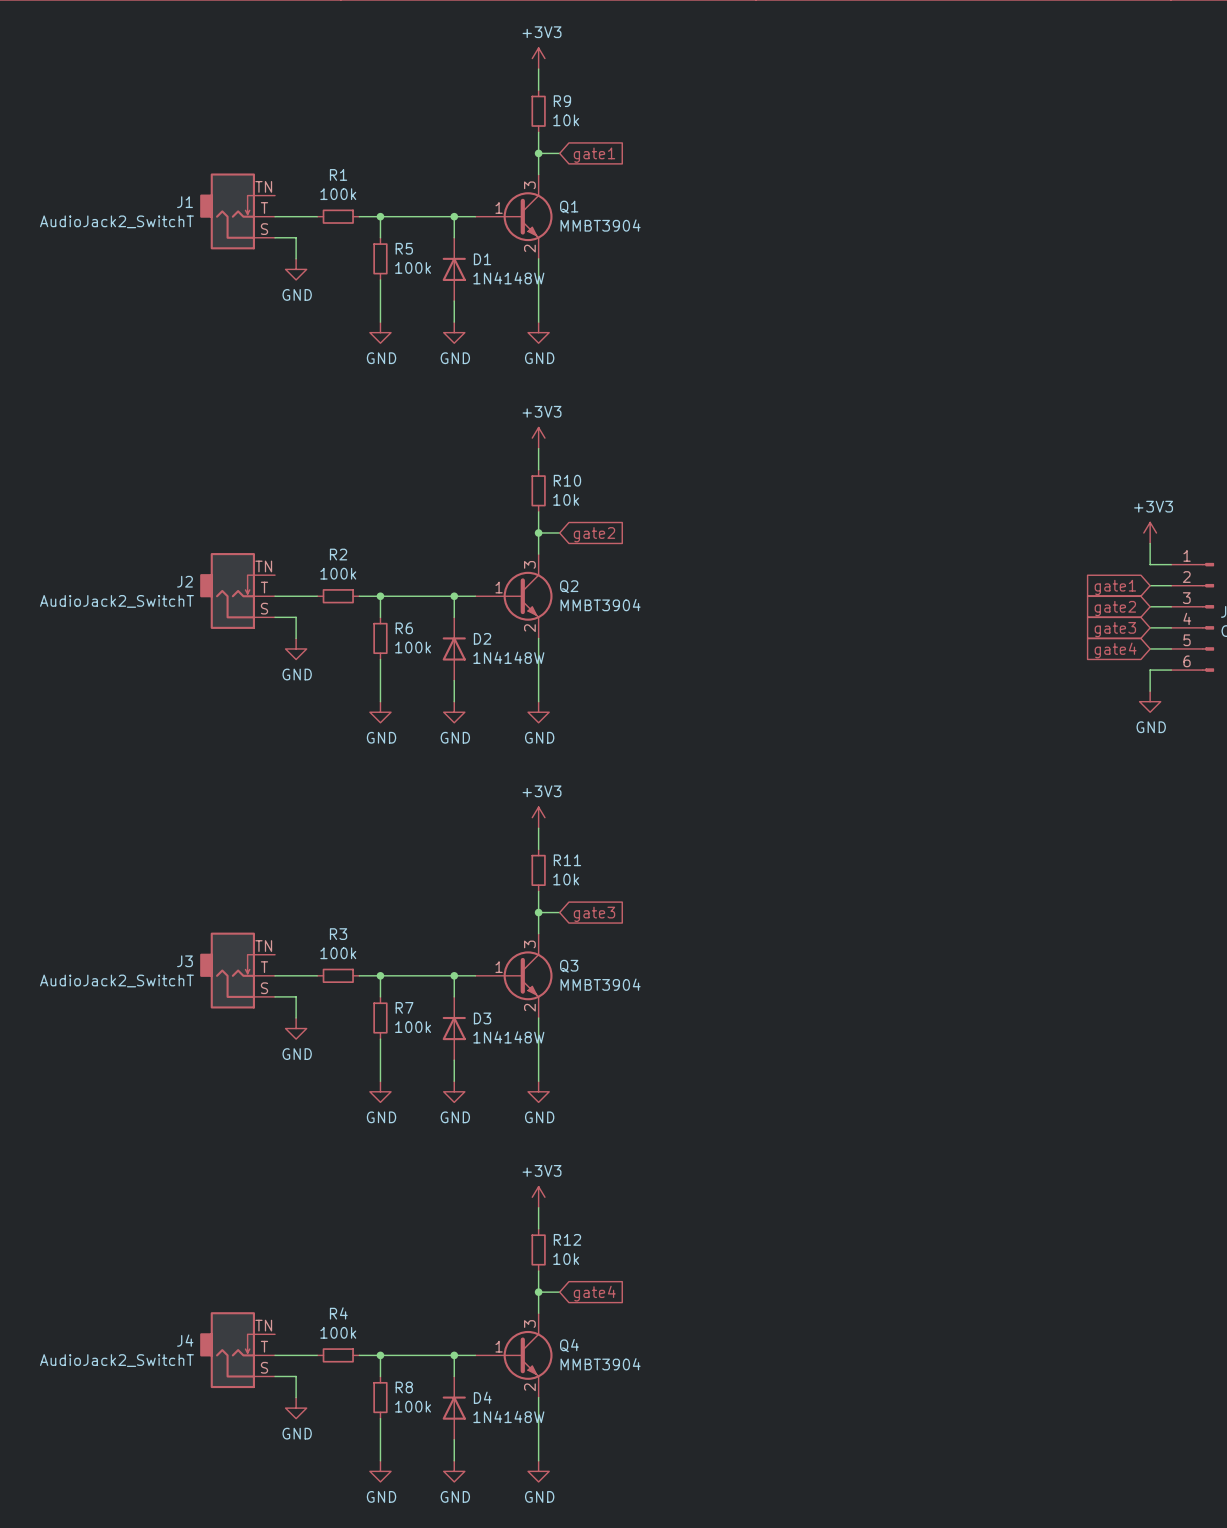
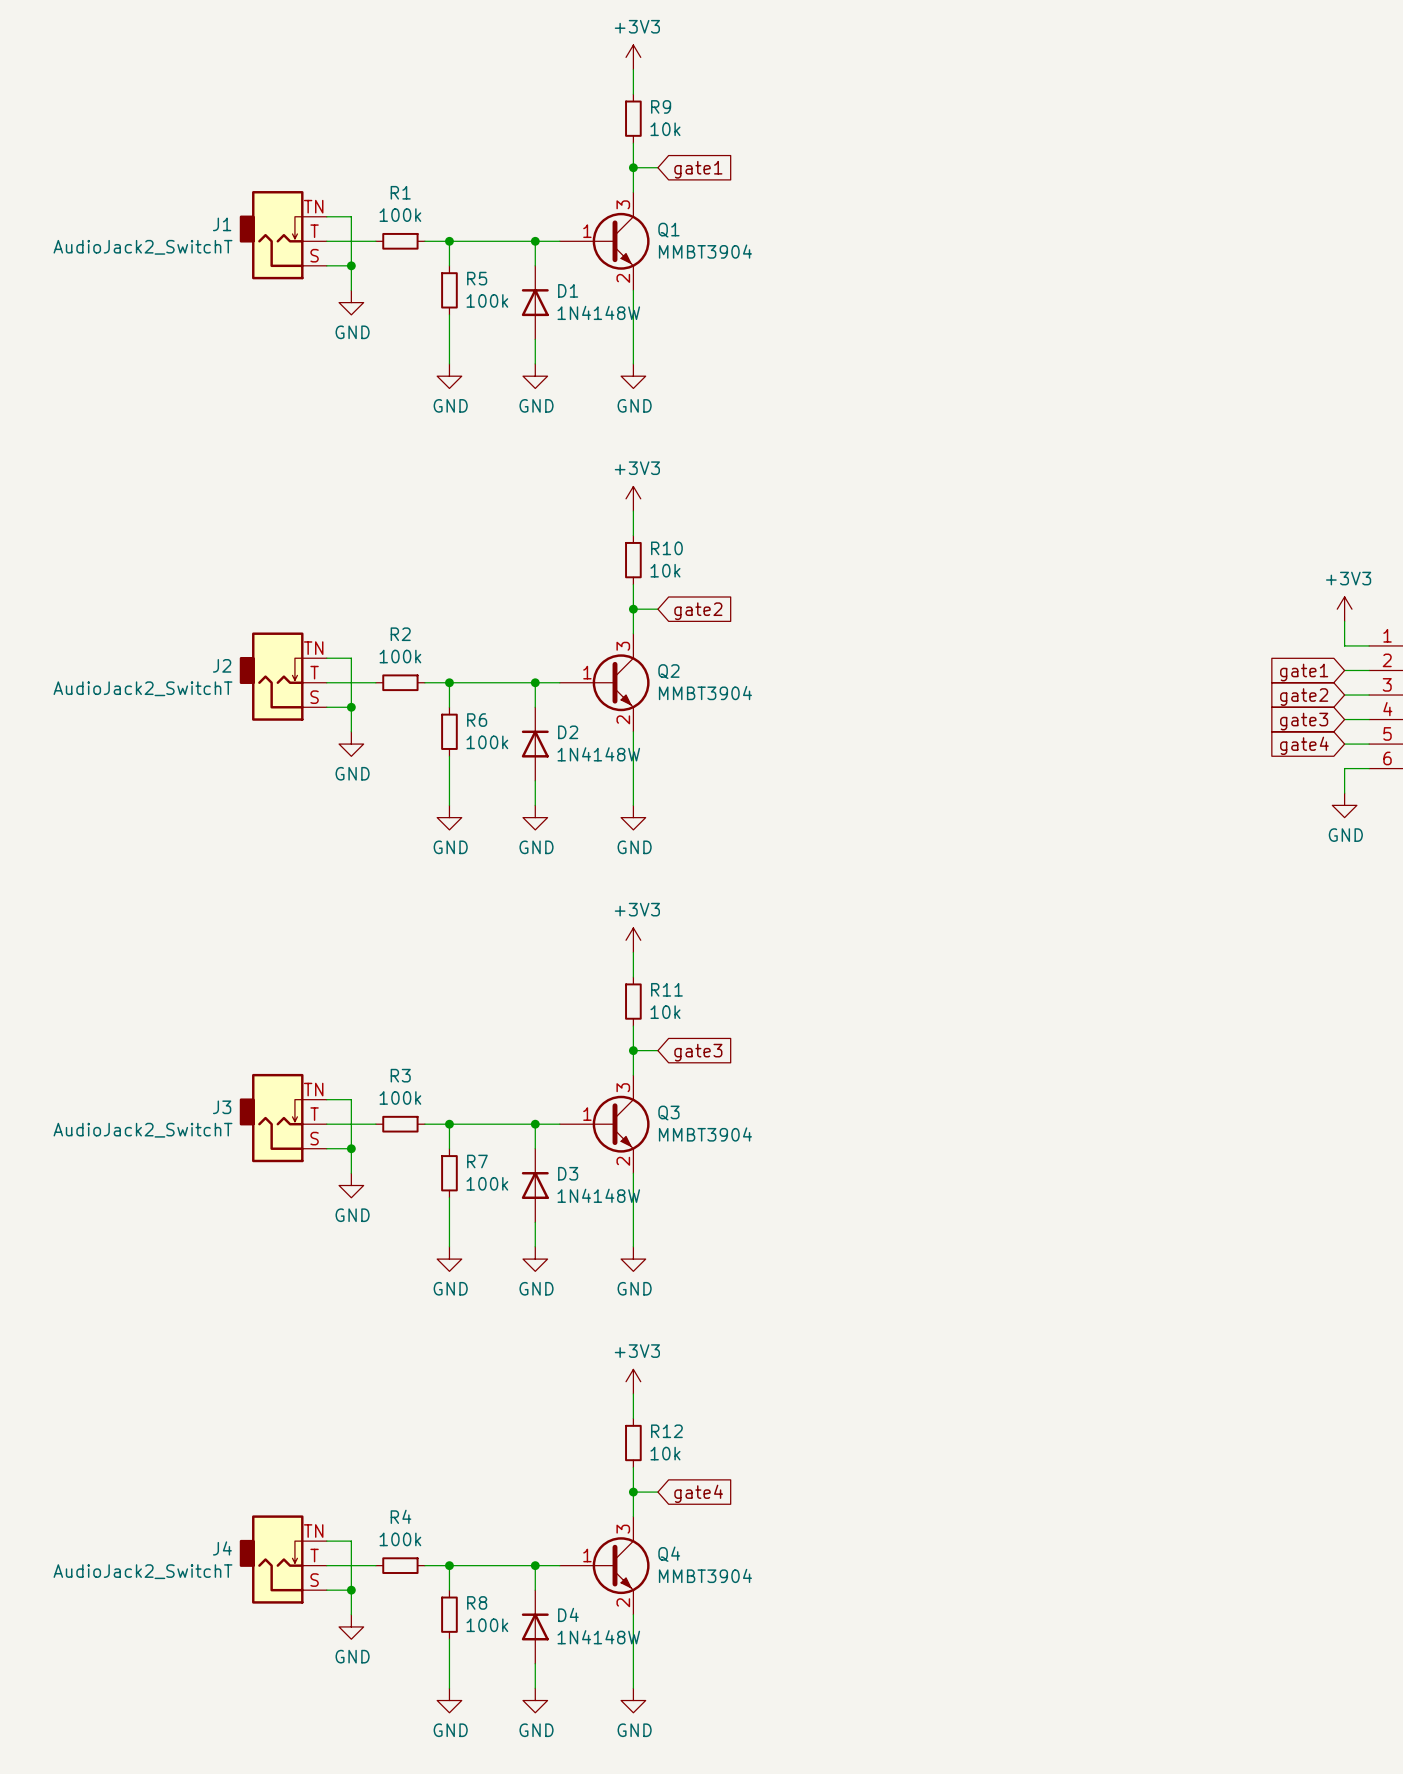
wire: none -> (326, 216) (351, 216) (351, 265)
junction: none -> (351, 265)
wire: none -> (326, 658) (351, 658) (351, 707)
junction: none -> (351, 707)
wire: none -> (326, 1099) (351, 1099) (351, 1148)
junction: none -> (351, 1148)
wire: none -> (326, 1541) (351, 1541) (351, 1590)
junction: none -> (351, 1590)

